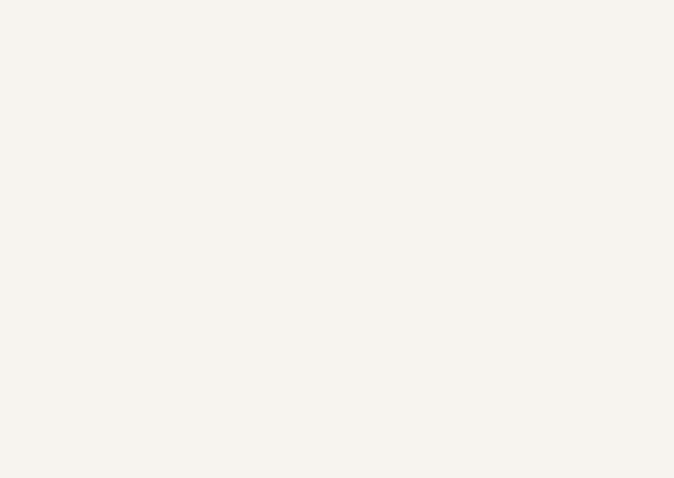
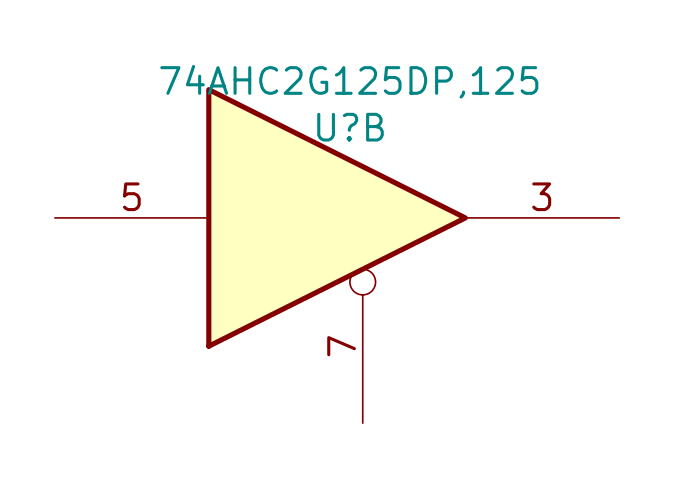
U?B: none -> 74AHC2G125DP,125 (337, 255)

